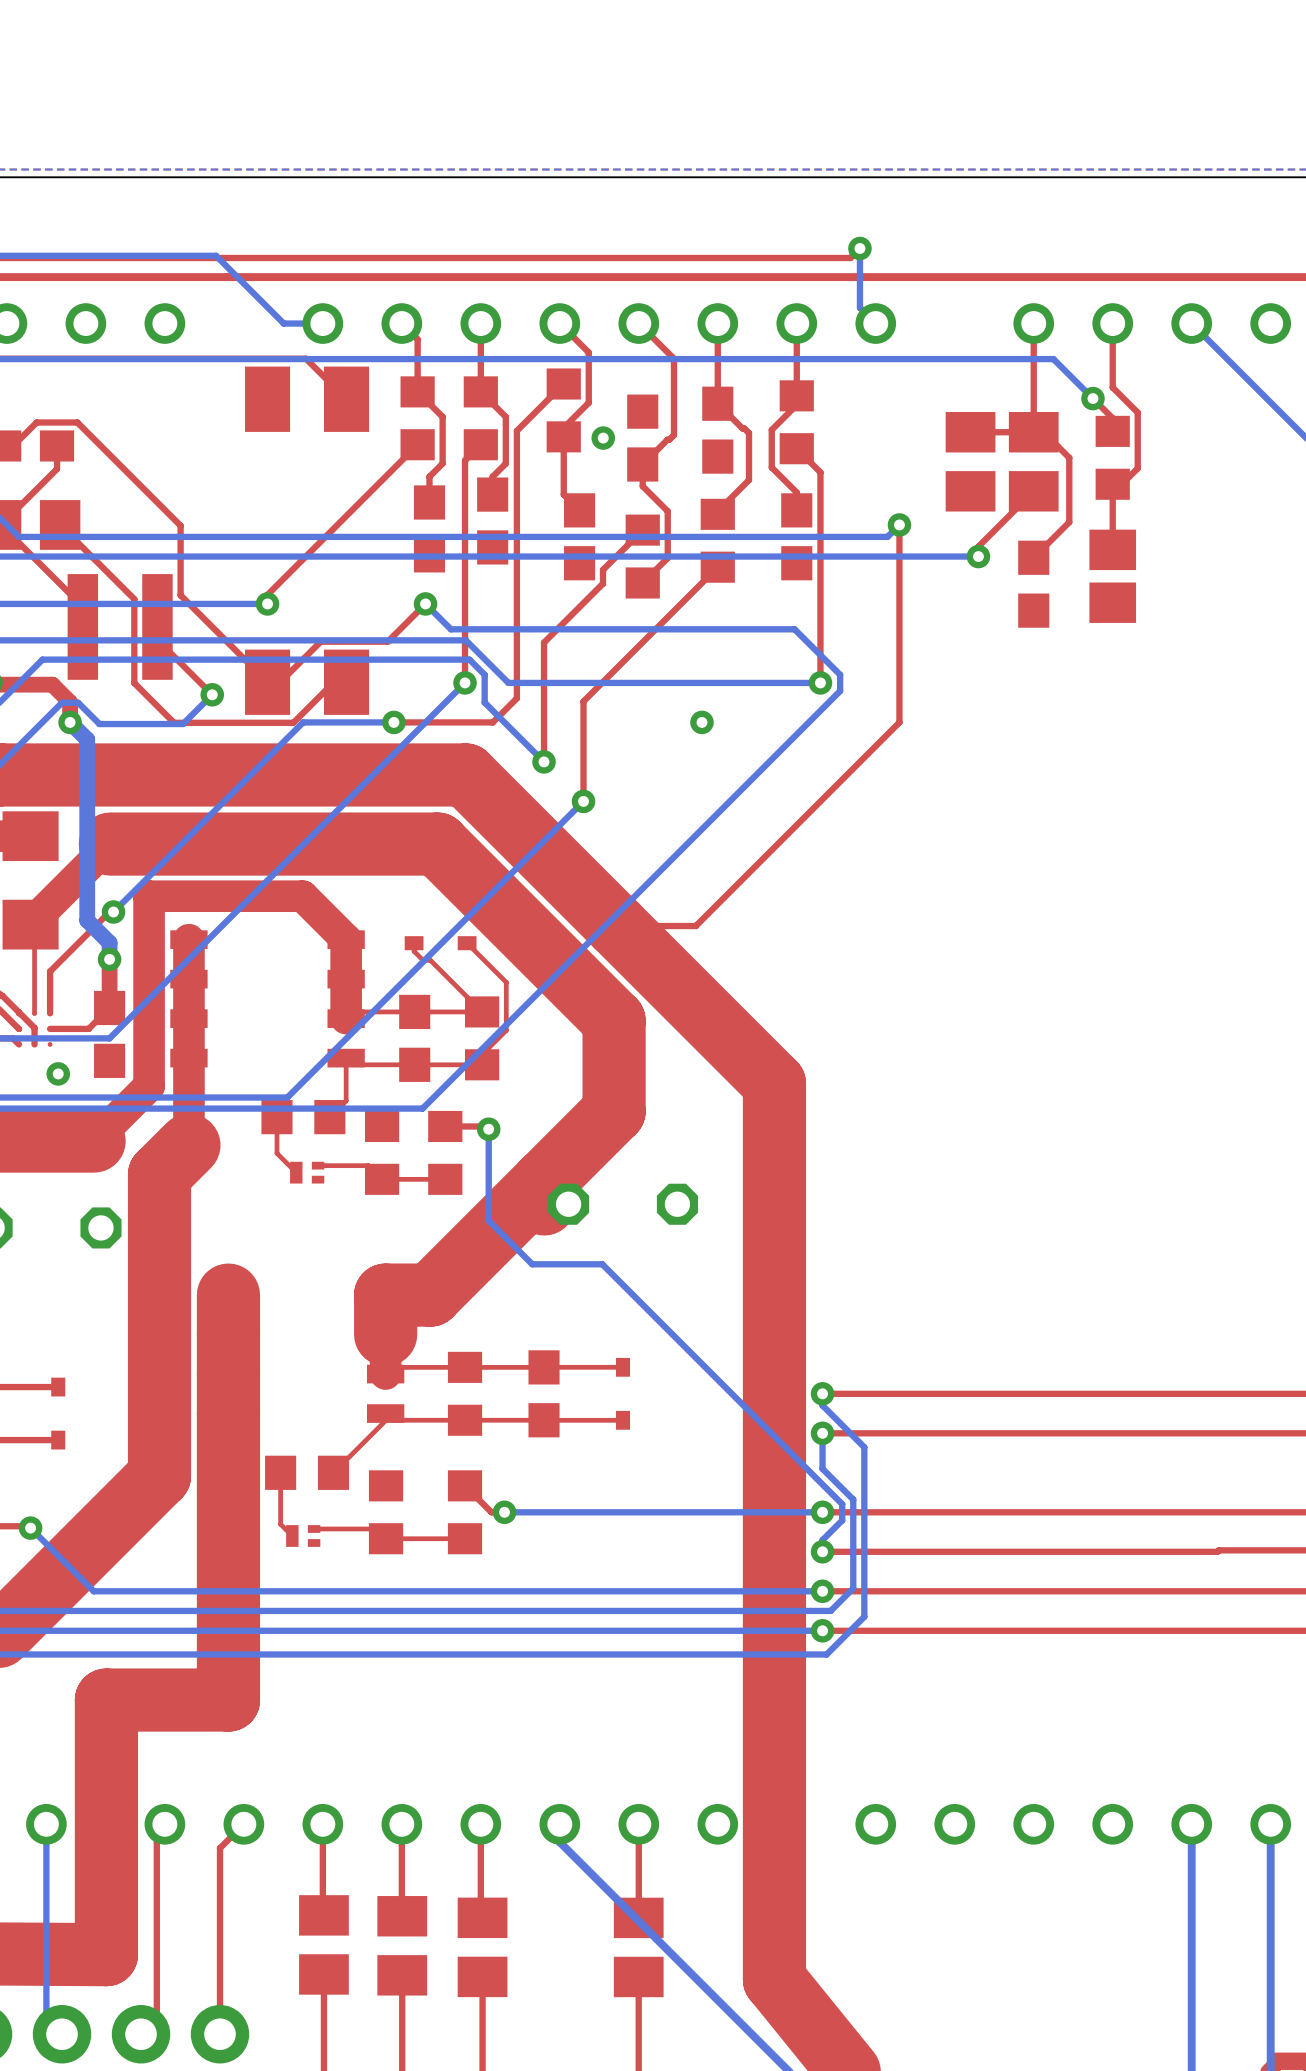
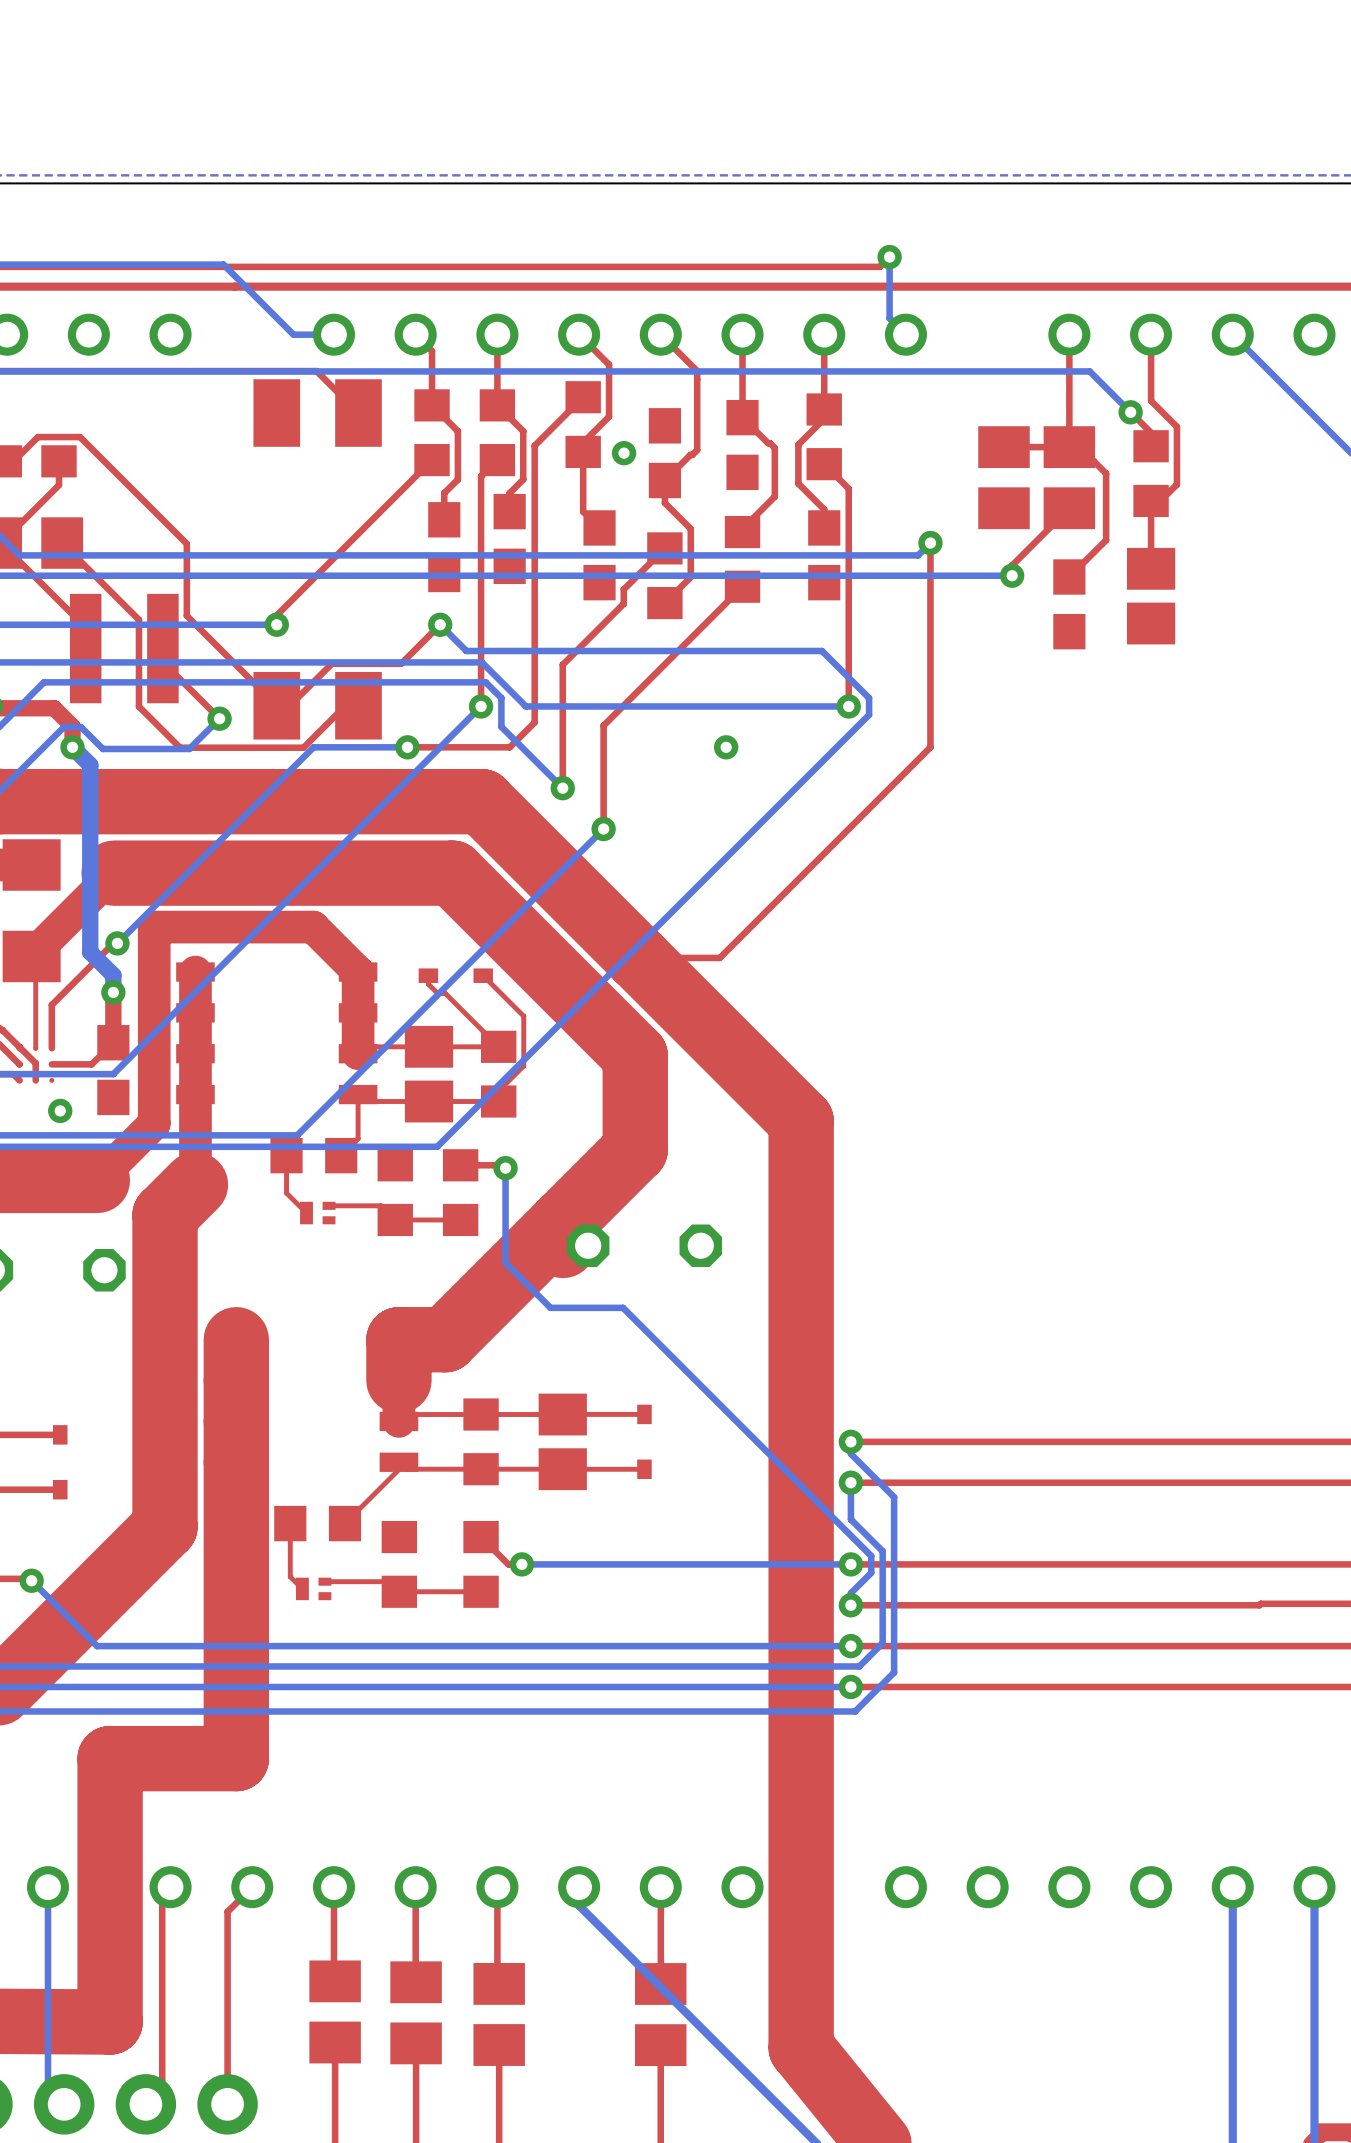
part footprint: [399, 994, 431, 1082] -> [404, 1025, 454, 1123]
part footprint: [528, 1350, 560, 1438] -> [538, 1393, 587, 1491]

